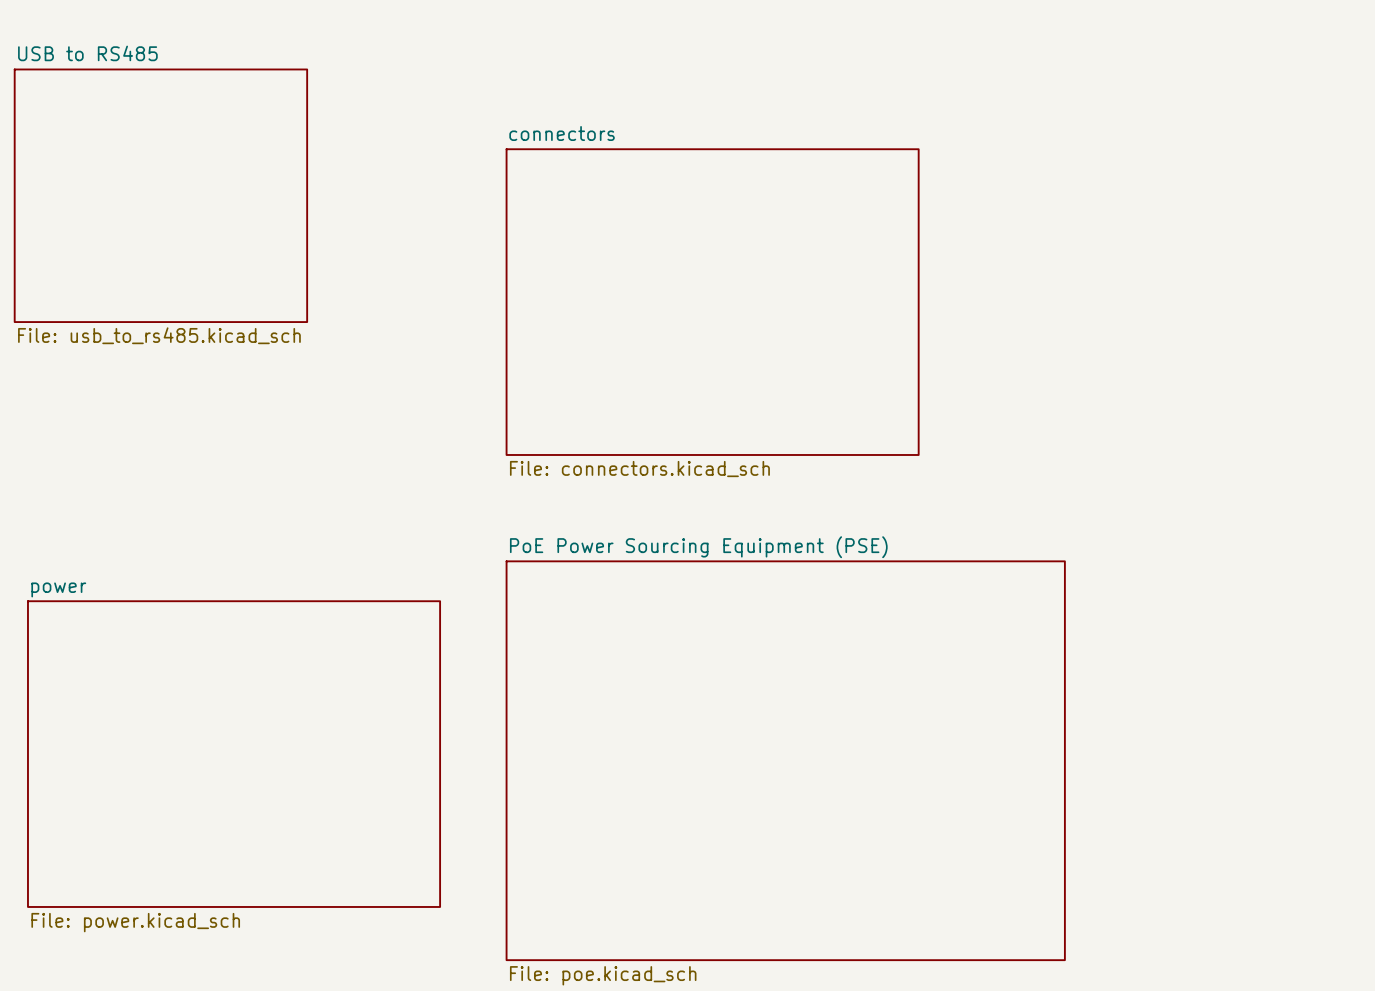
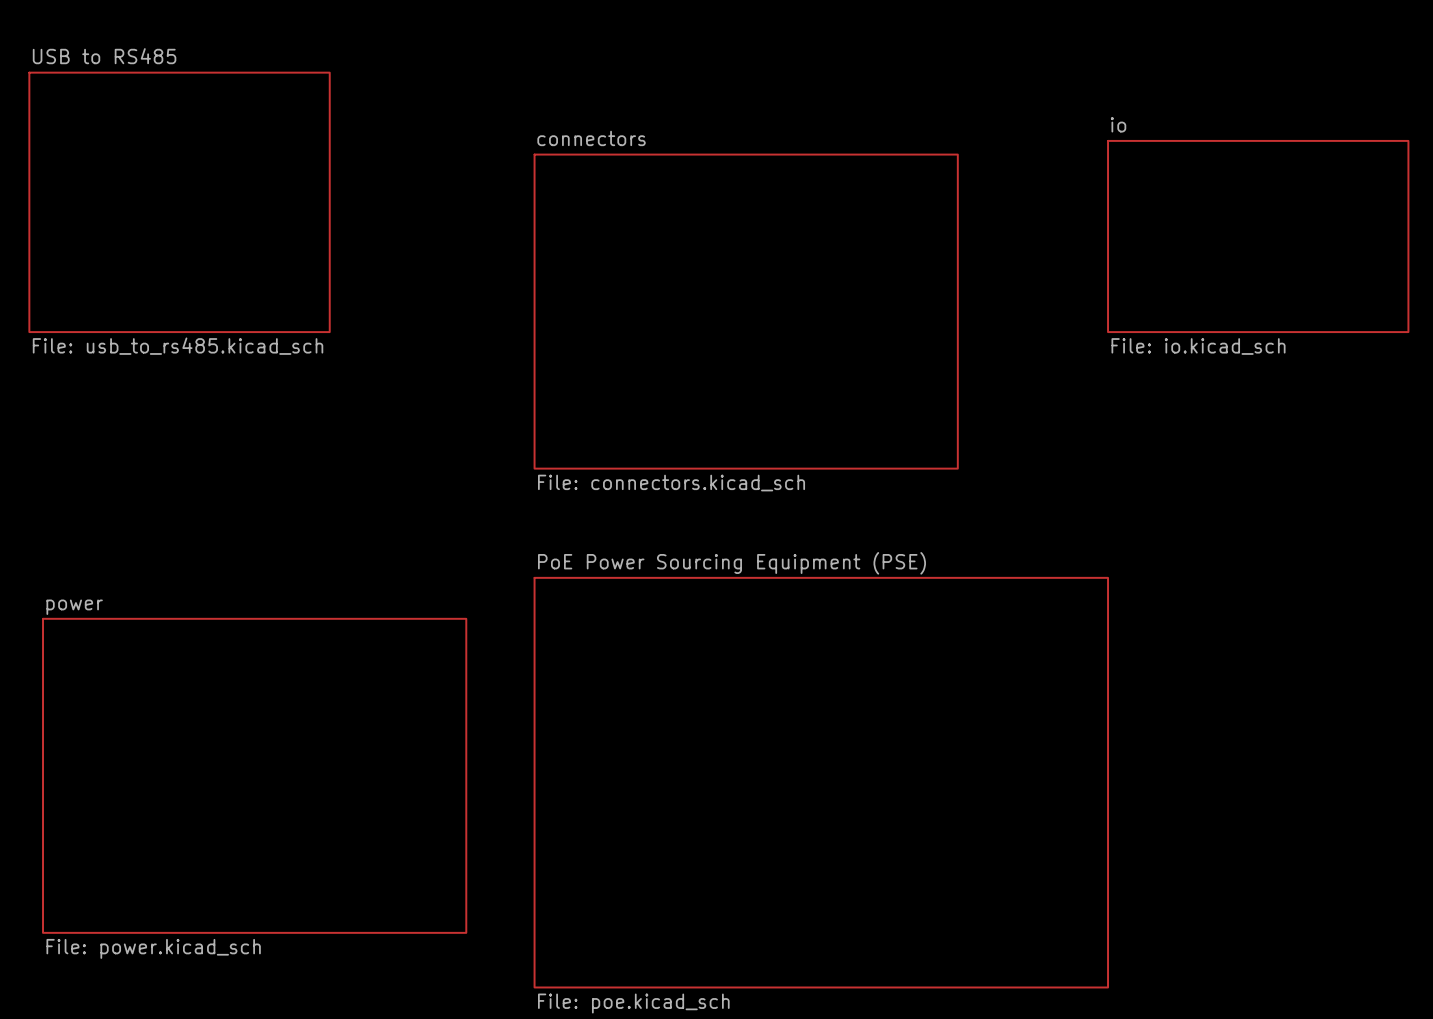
sheet io: none -> File: io.kicad_sch (1258, 236)

